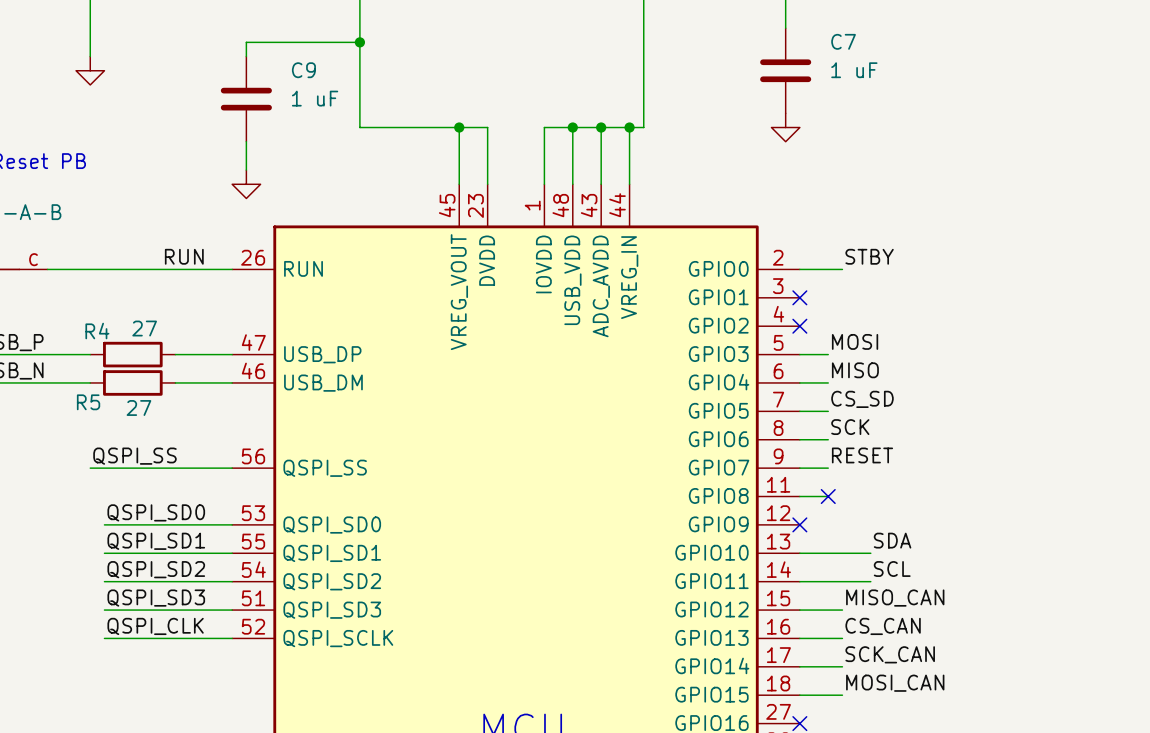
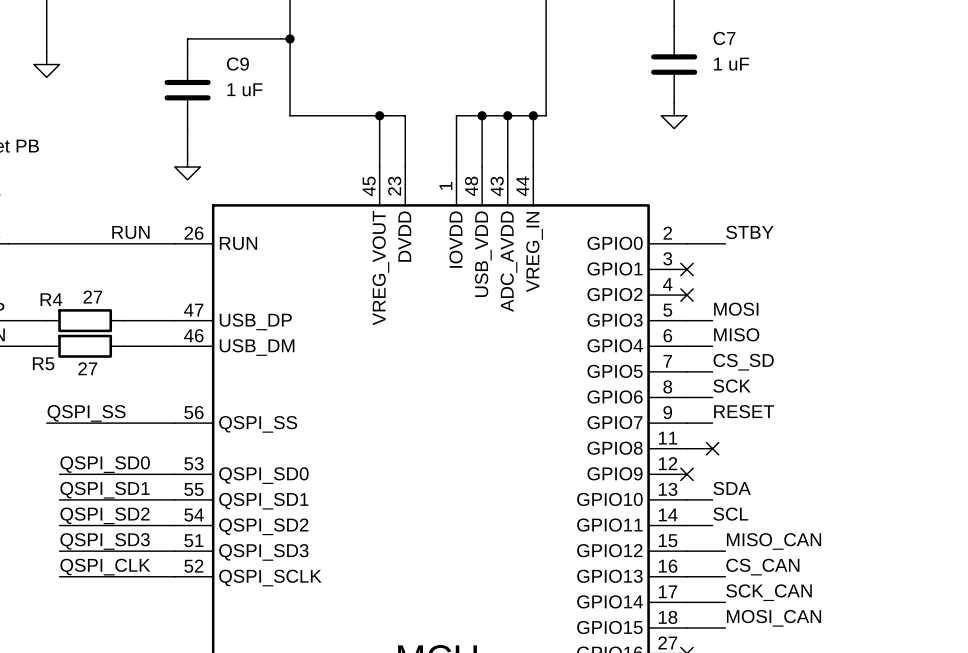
label position: SDA (892, 540) -> SDA (732, 488)
wire: (828, 553) (870, 553) -> none
label position: SCL (892, 569) -> SCL (730, 514)
wire: (828, 581) (870, 581) -> none

